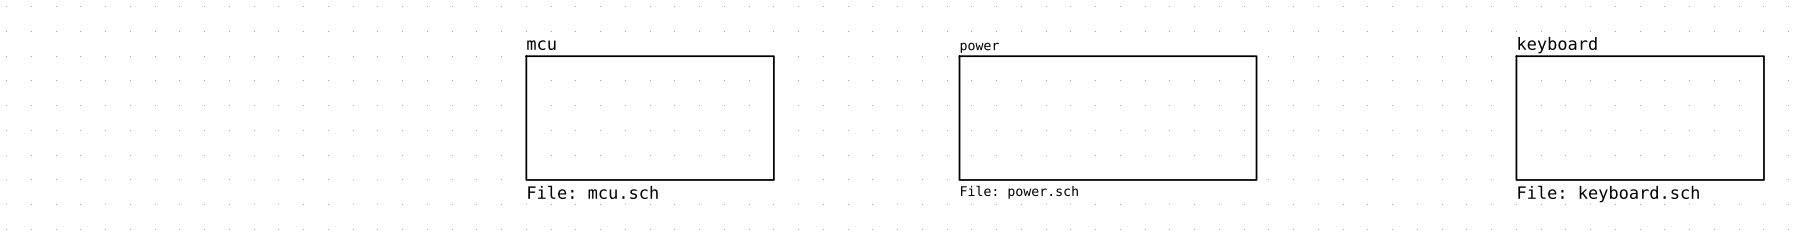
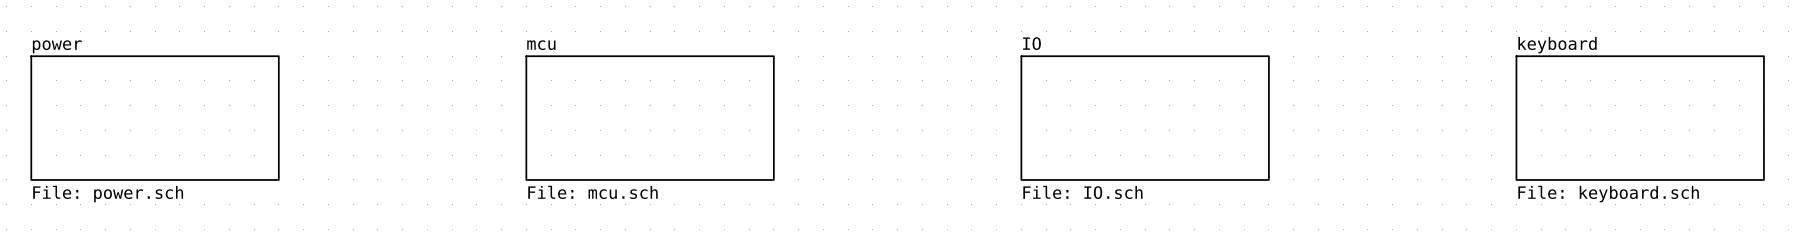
sheet power: none -> File: power.sch (155, 118)
sheet power: File: power.sch (1108, 118) -> none
sheet IO: none -> File: IO.sch (1145, 118)

